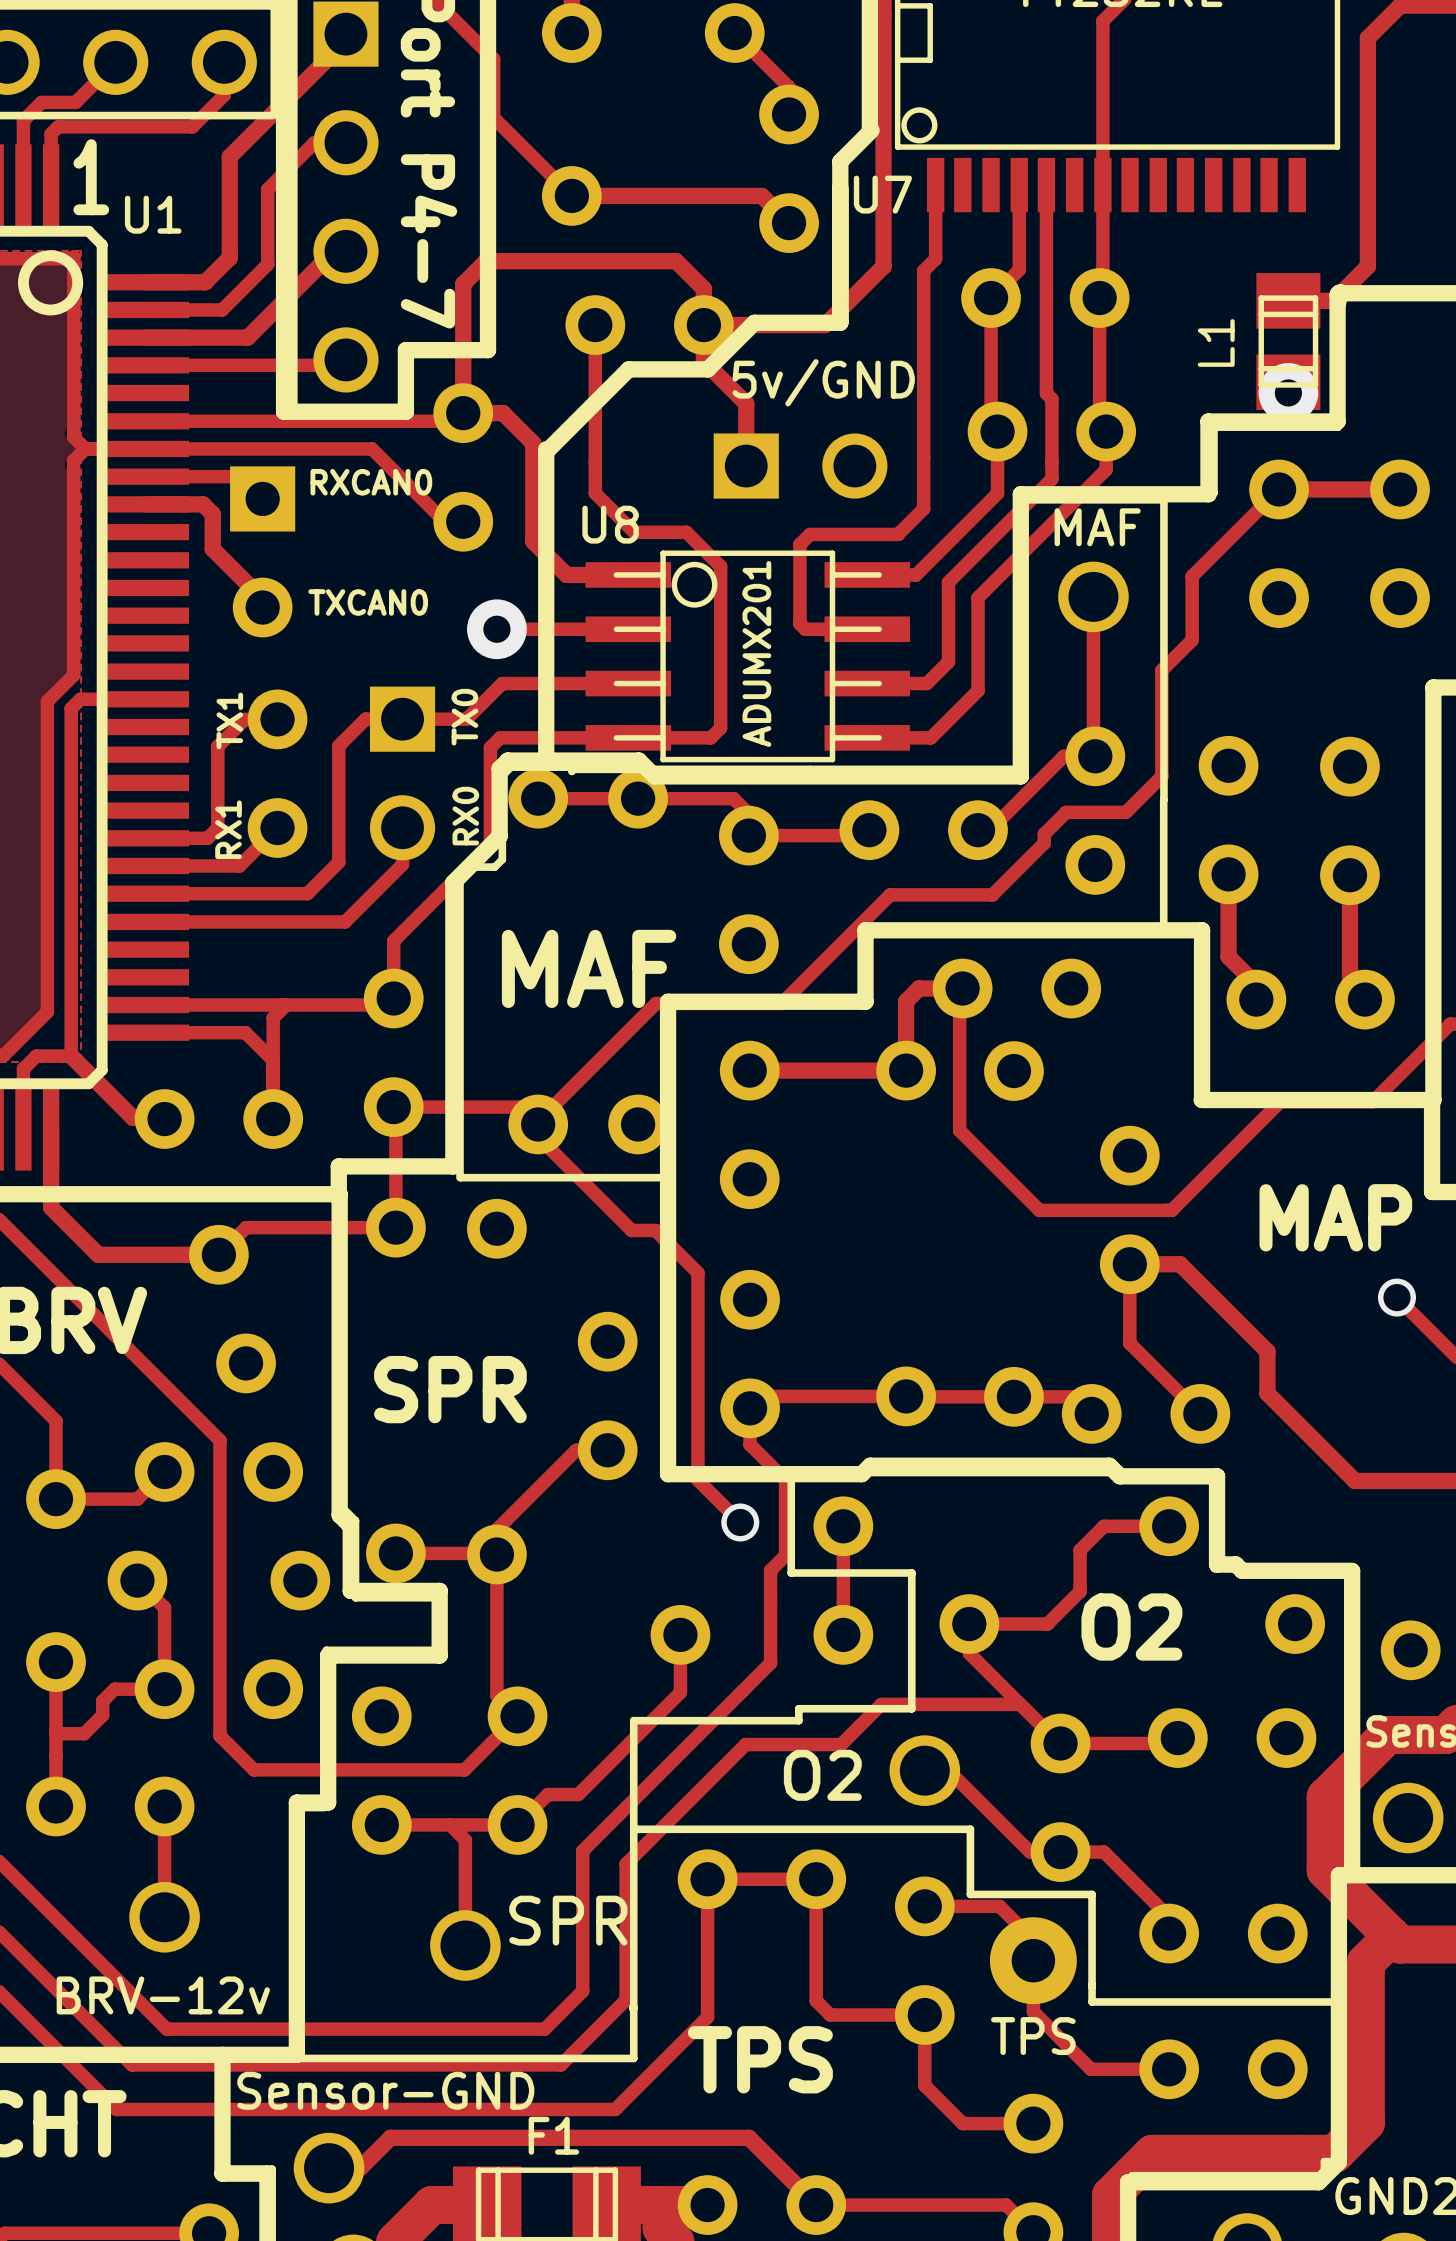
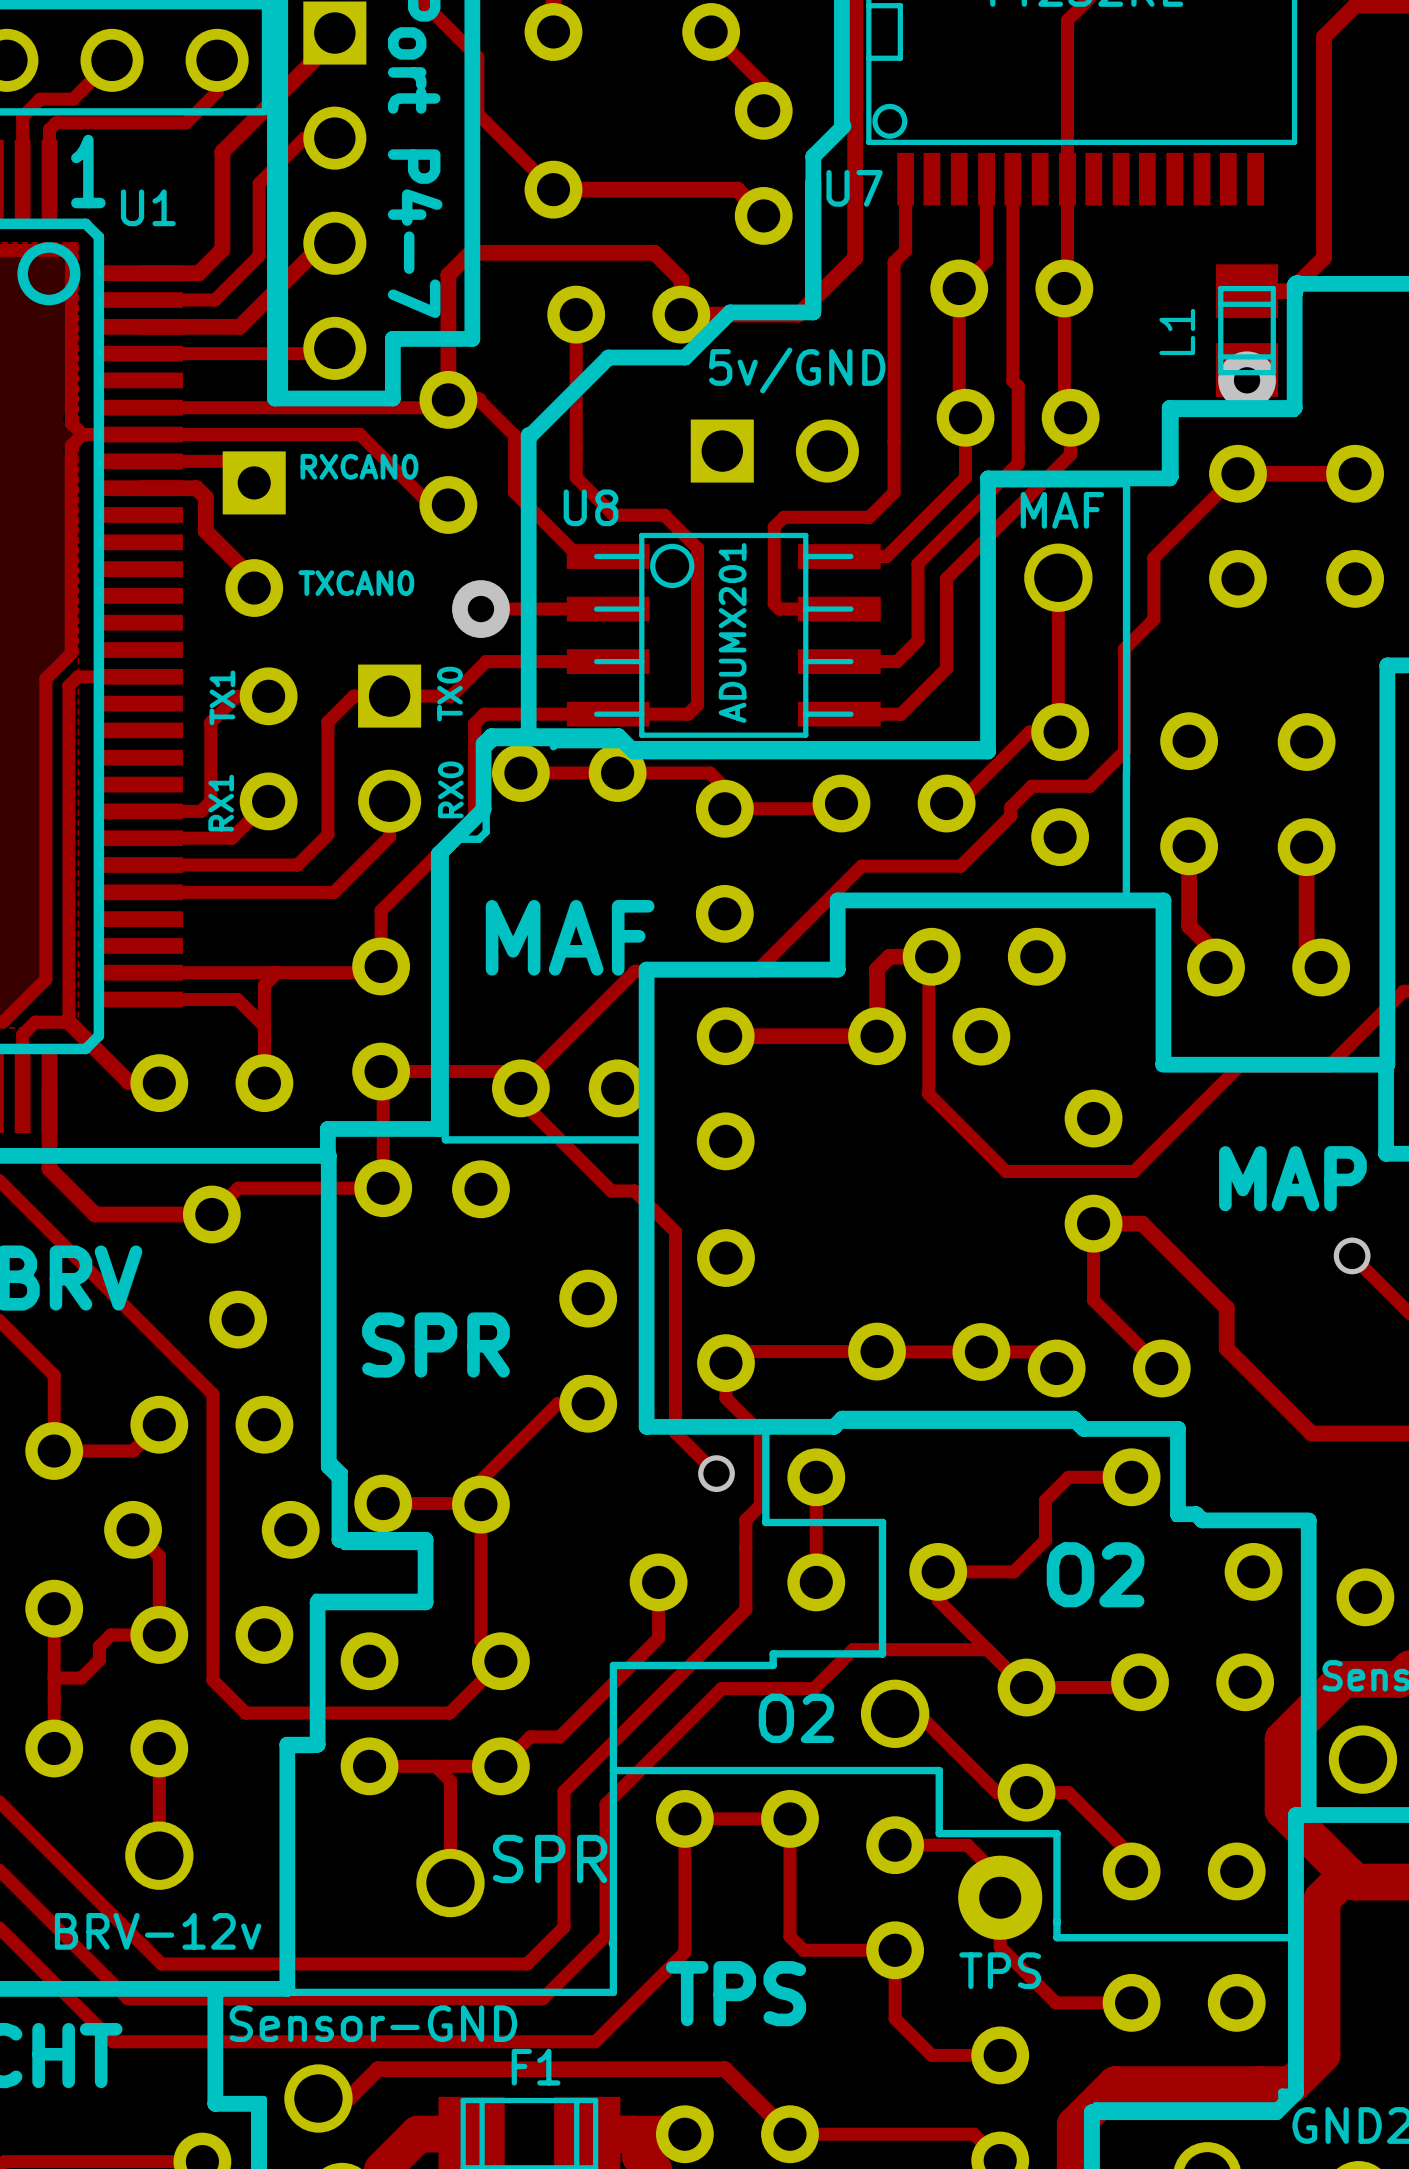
track: (703, 325) (703, 361) (746, 403) (746, 466) -> none
track: (494, 413) (503, 413) (533, 443) (533, 541) (566, 574) (597, 574) -> (478, 399) (514, 435) (514, 492) (578, 556)

